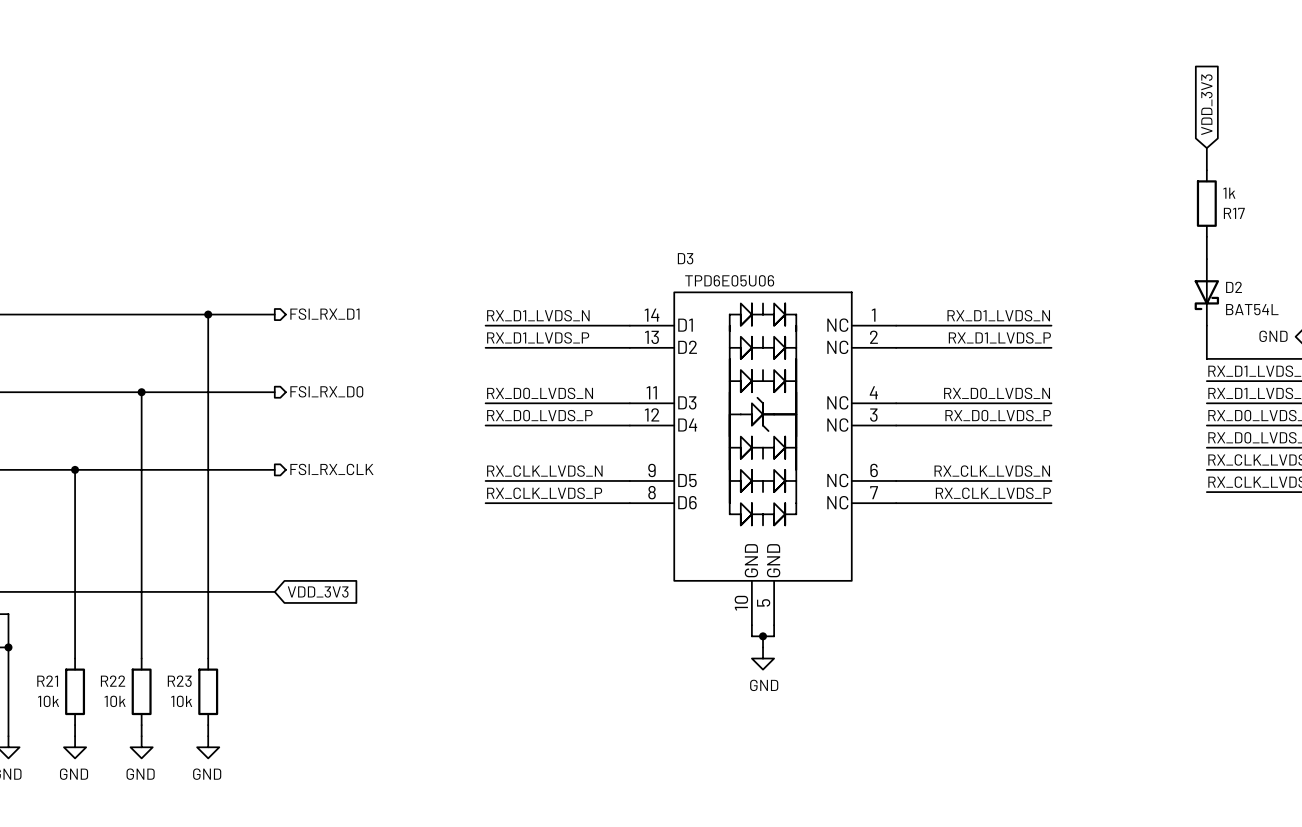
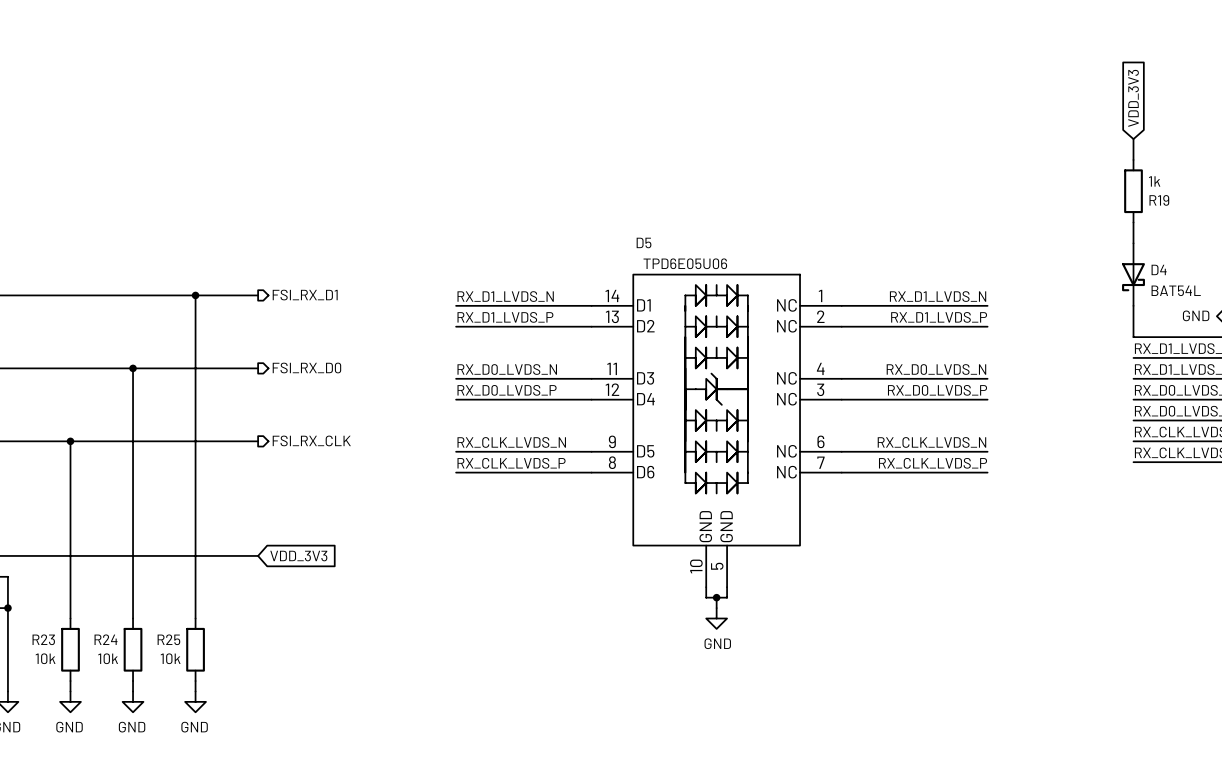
R17 name: R17 (1234, 213) -> R19 (1159, 200)
D3 name: D3 (685, 258) -> D5 (644, 242)
D2 name: D2 (1234, 287) -> D4 (1159, 269)
R21 name: R21 (47, 681) -> R23 (43, 639)
R22 name: R22 (113, 681) -> R24 (106, 639)
R23 name: R23 (179, 681) -> R25 (168, 639)

